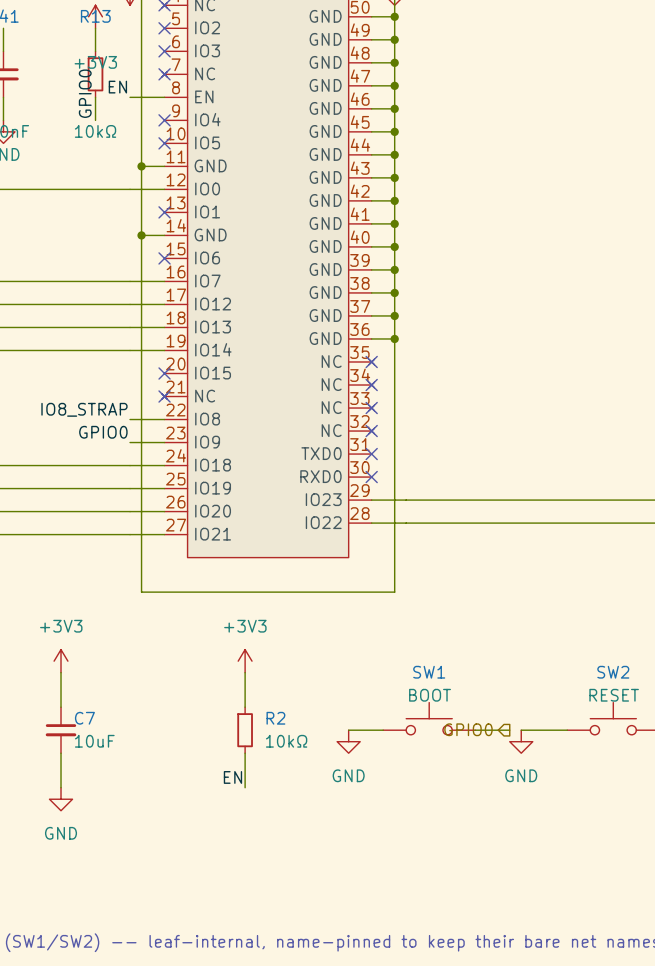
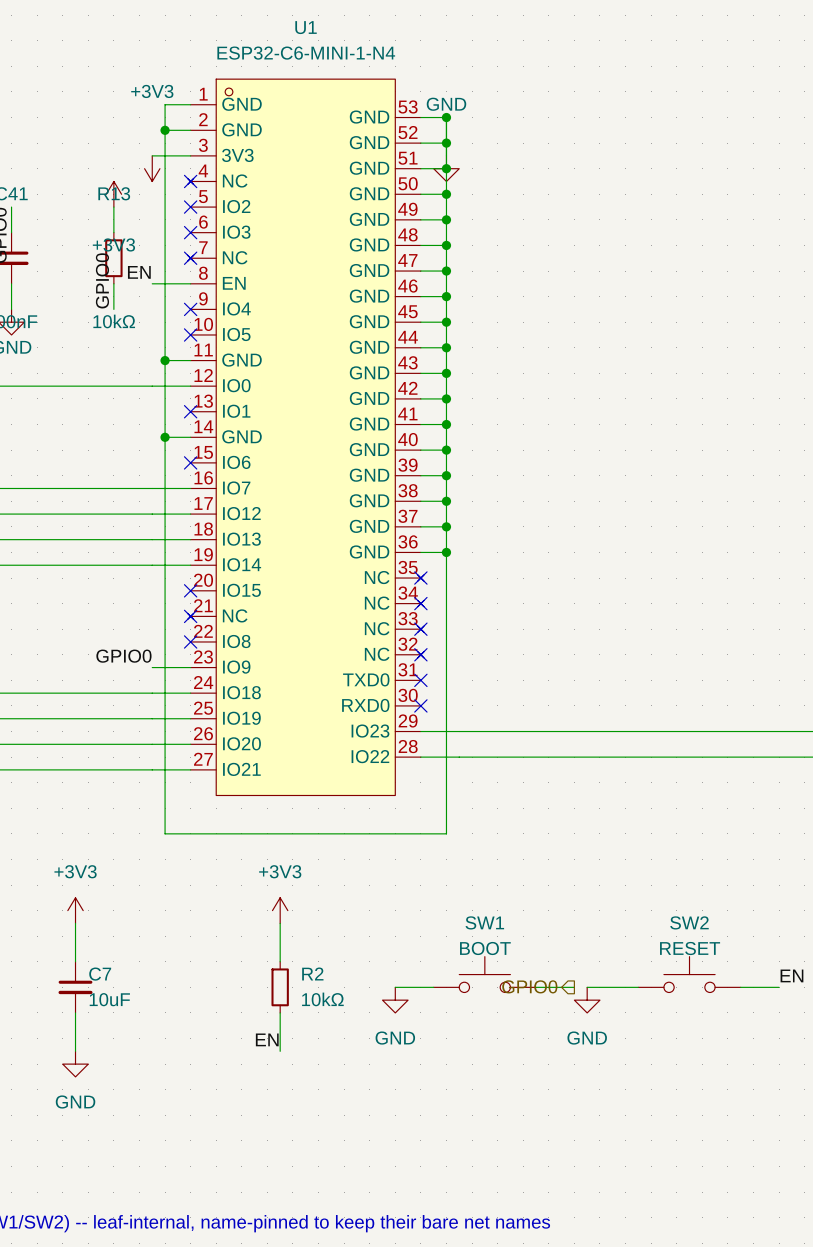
label: IO8_STRAP (84, 409) -> none
wire: (130, 419) (164, 419) -> none
no-connect mark: none -> (190, 641)

